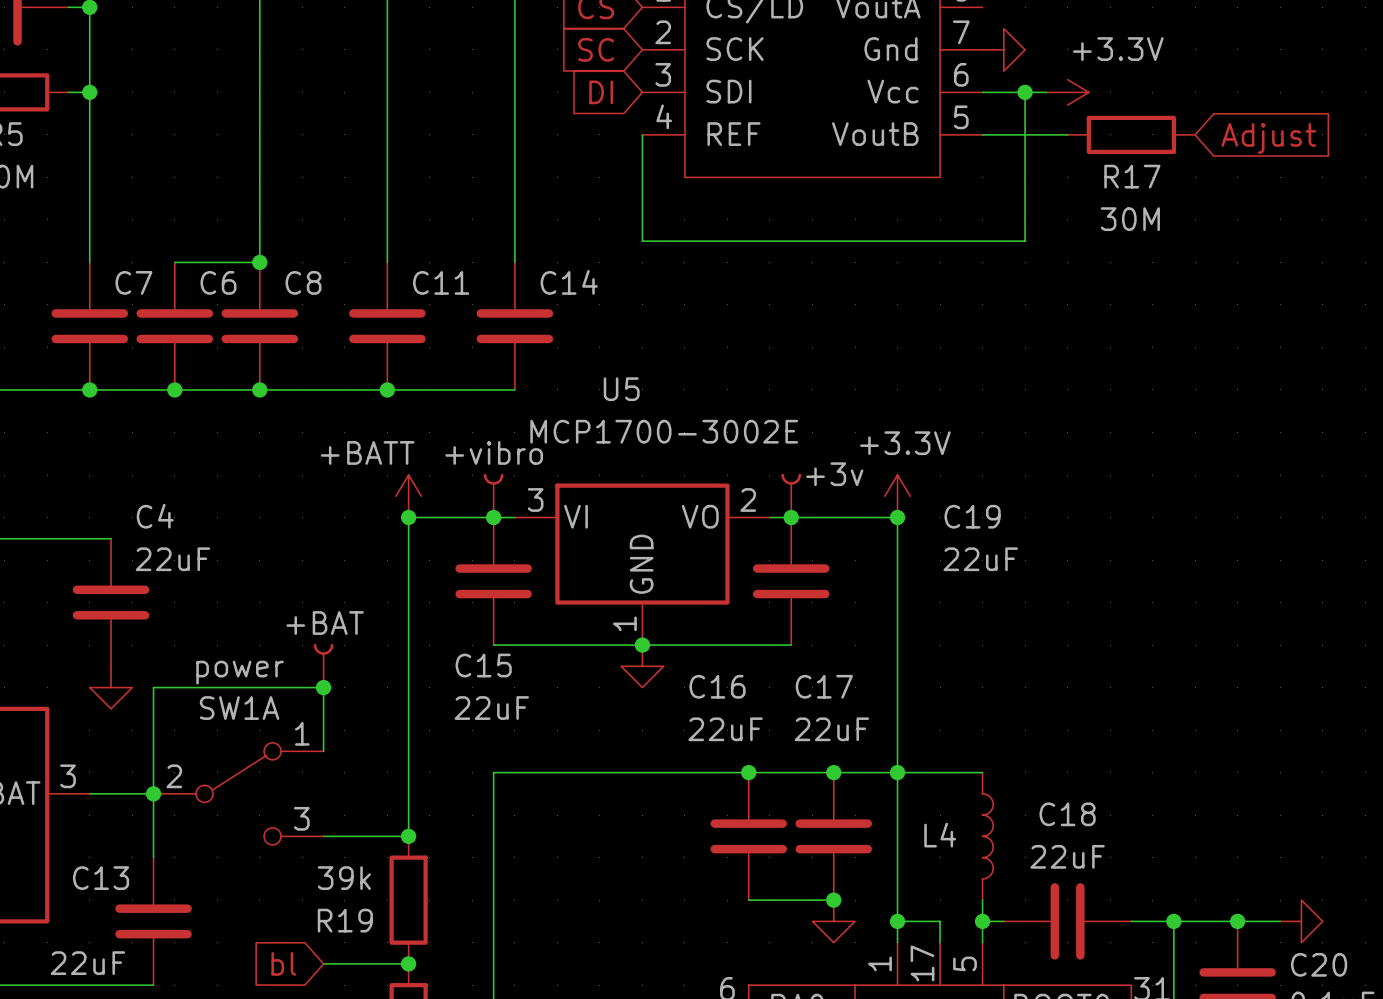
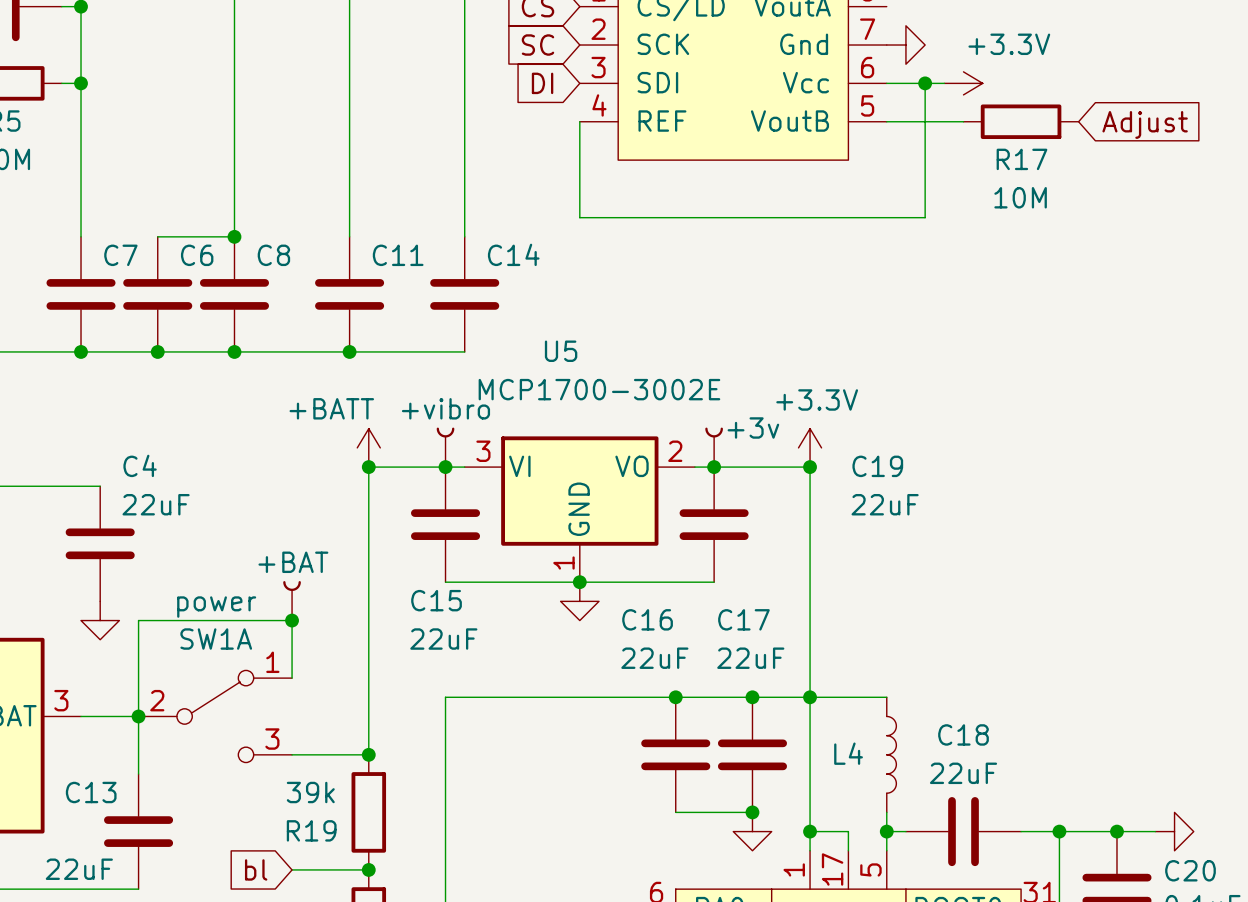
R17 value: 30M (1130, 219) -> 10M (1020, 197)

